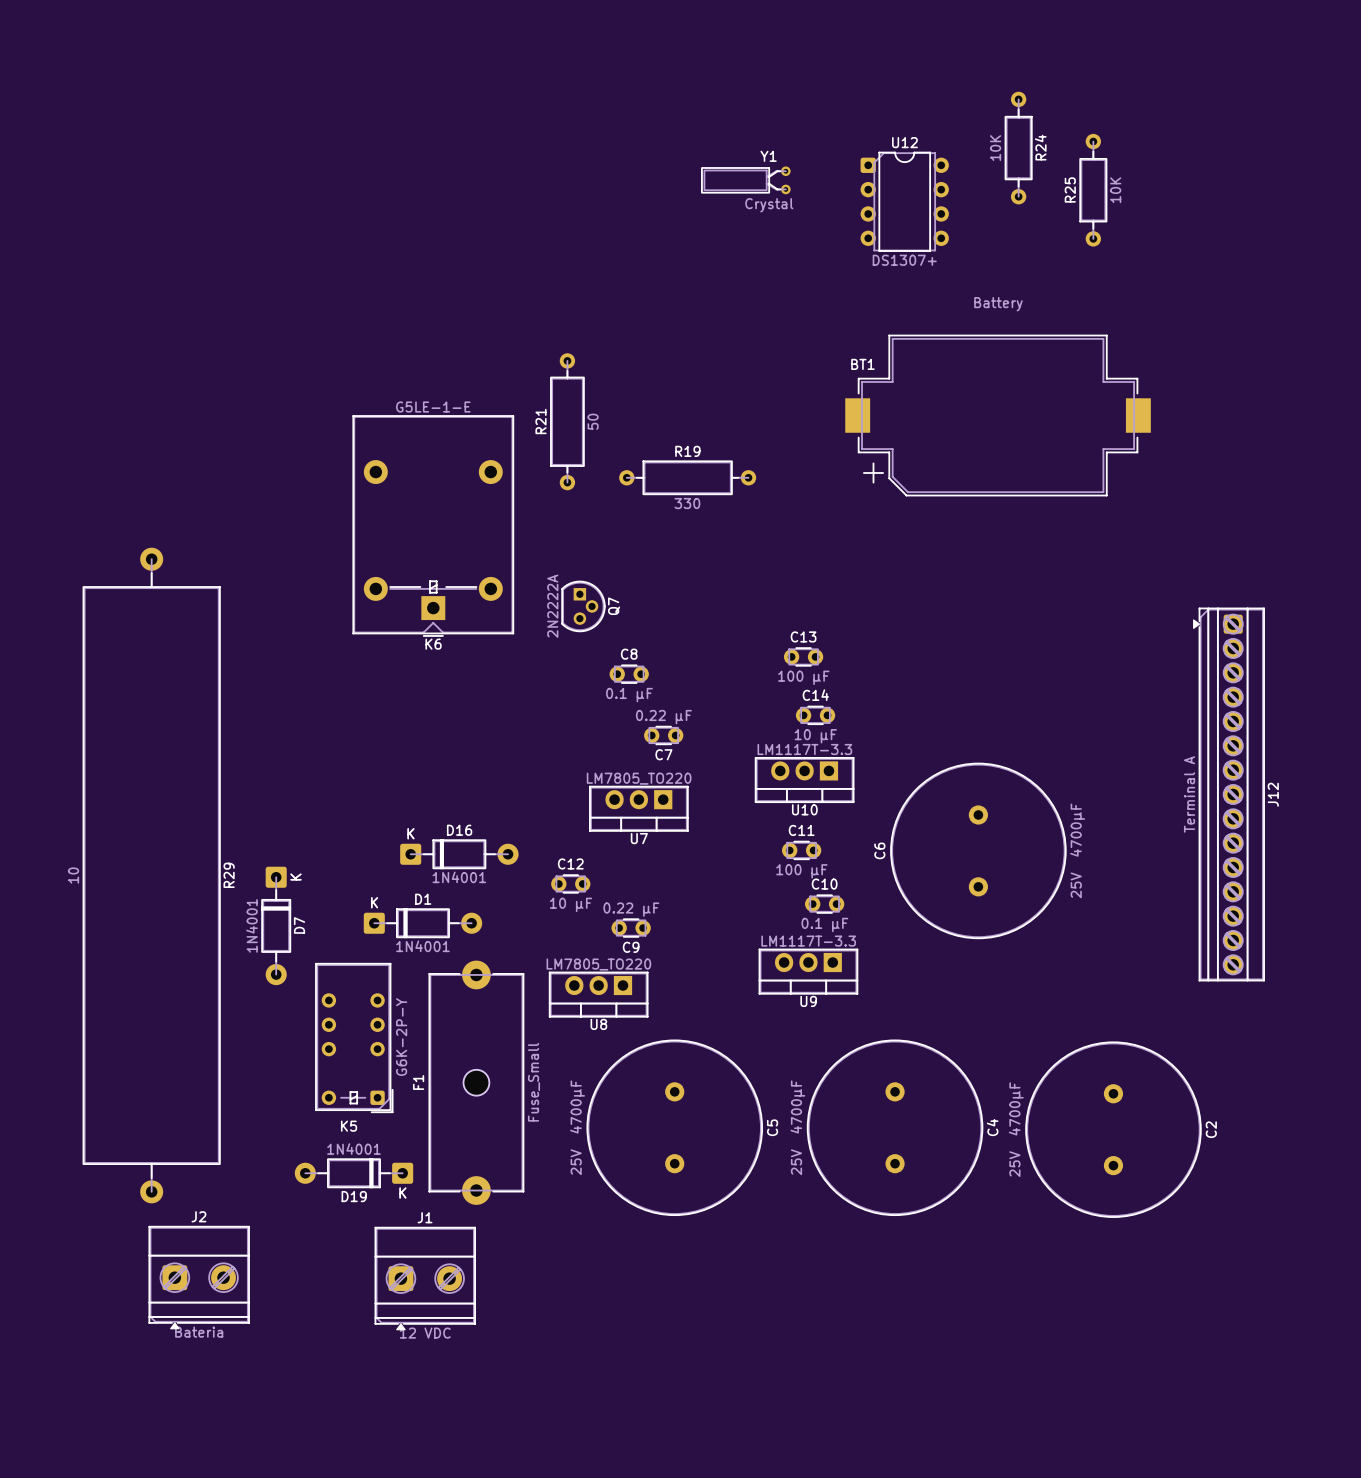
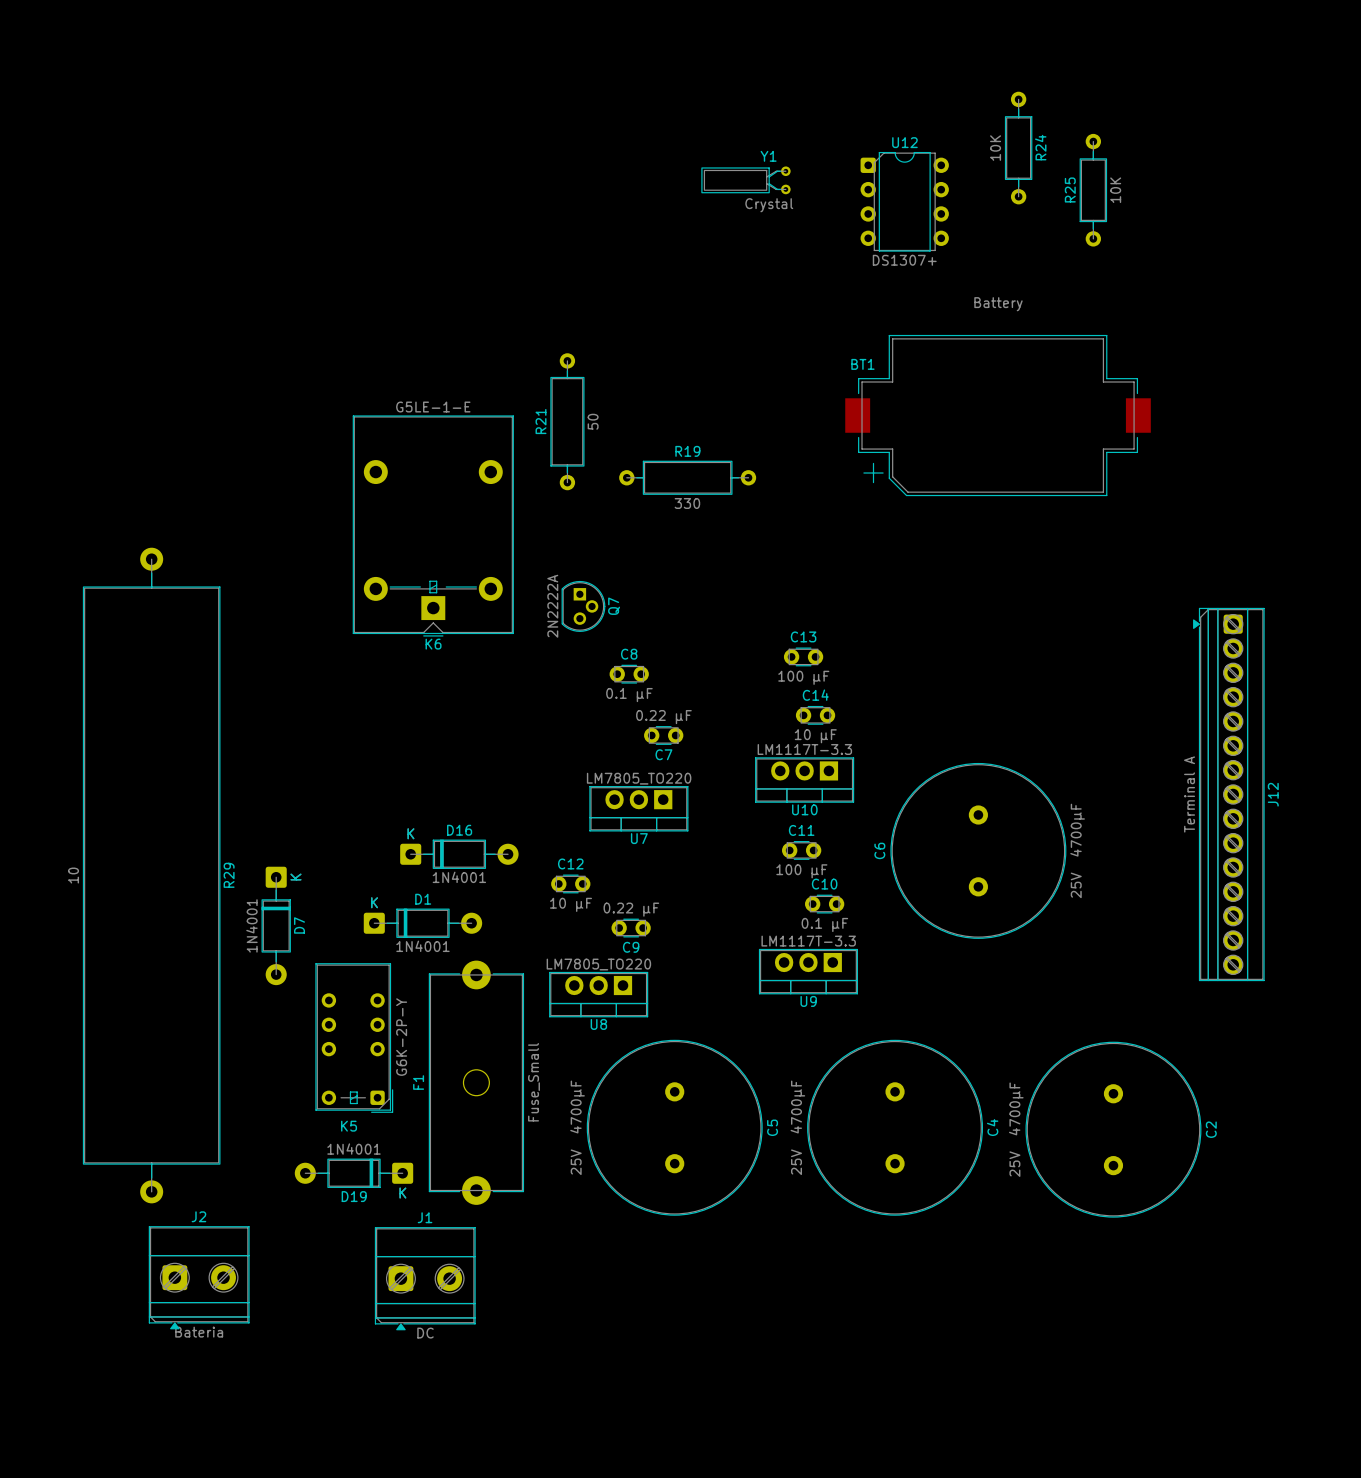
J1 value: 12 VDC (425, 1333) -> DC (425, 1333)

